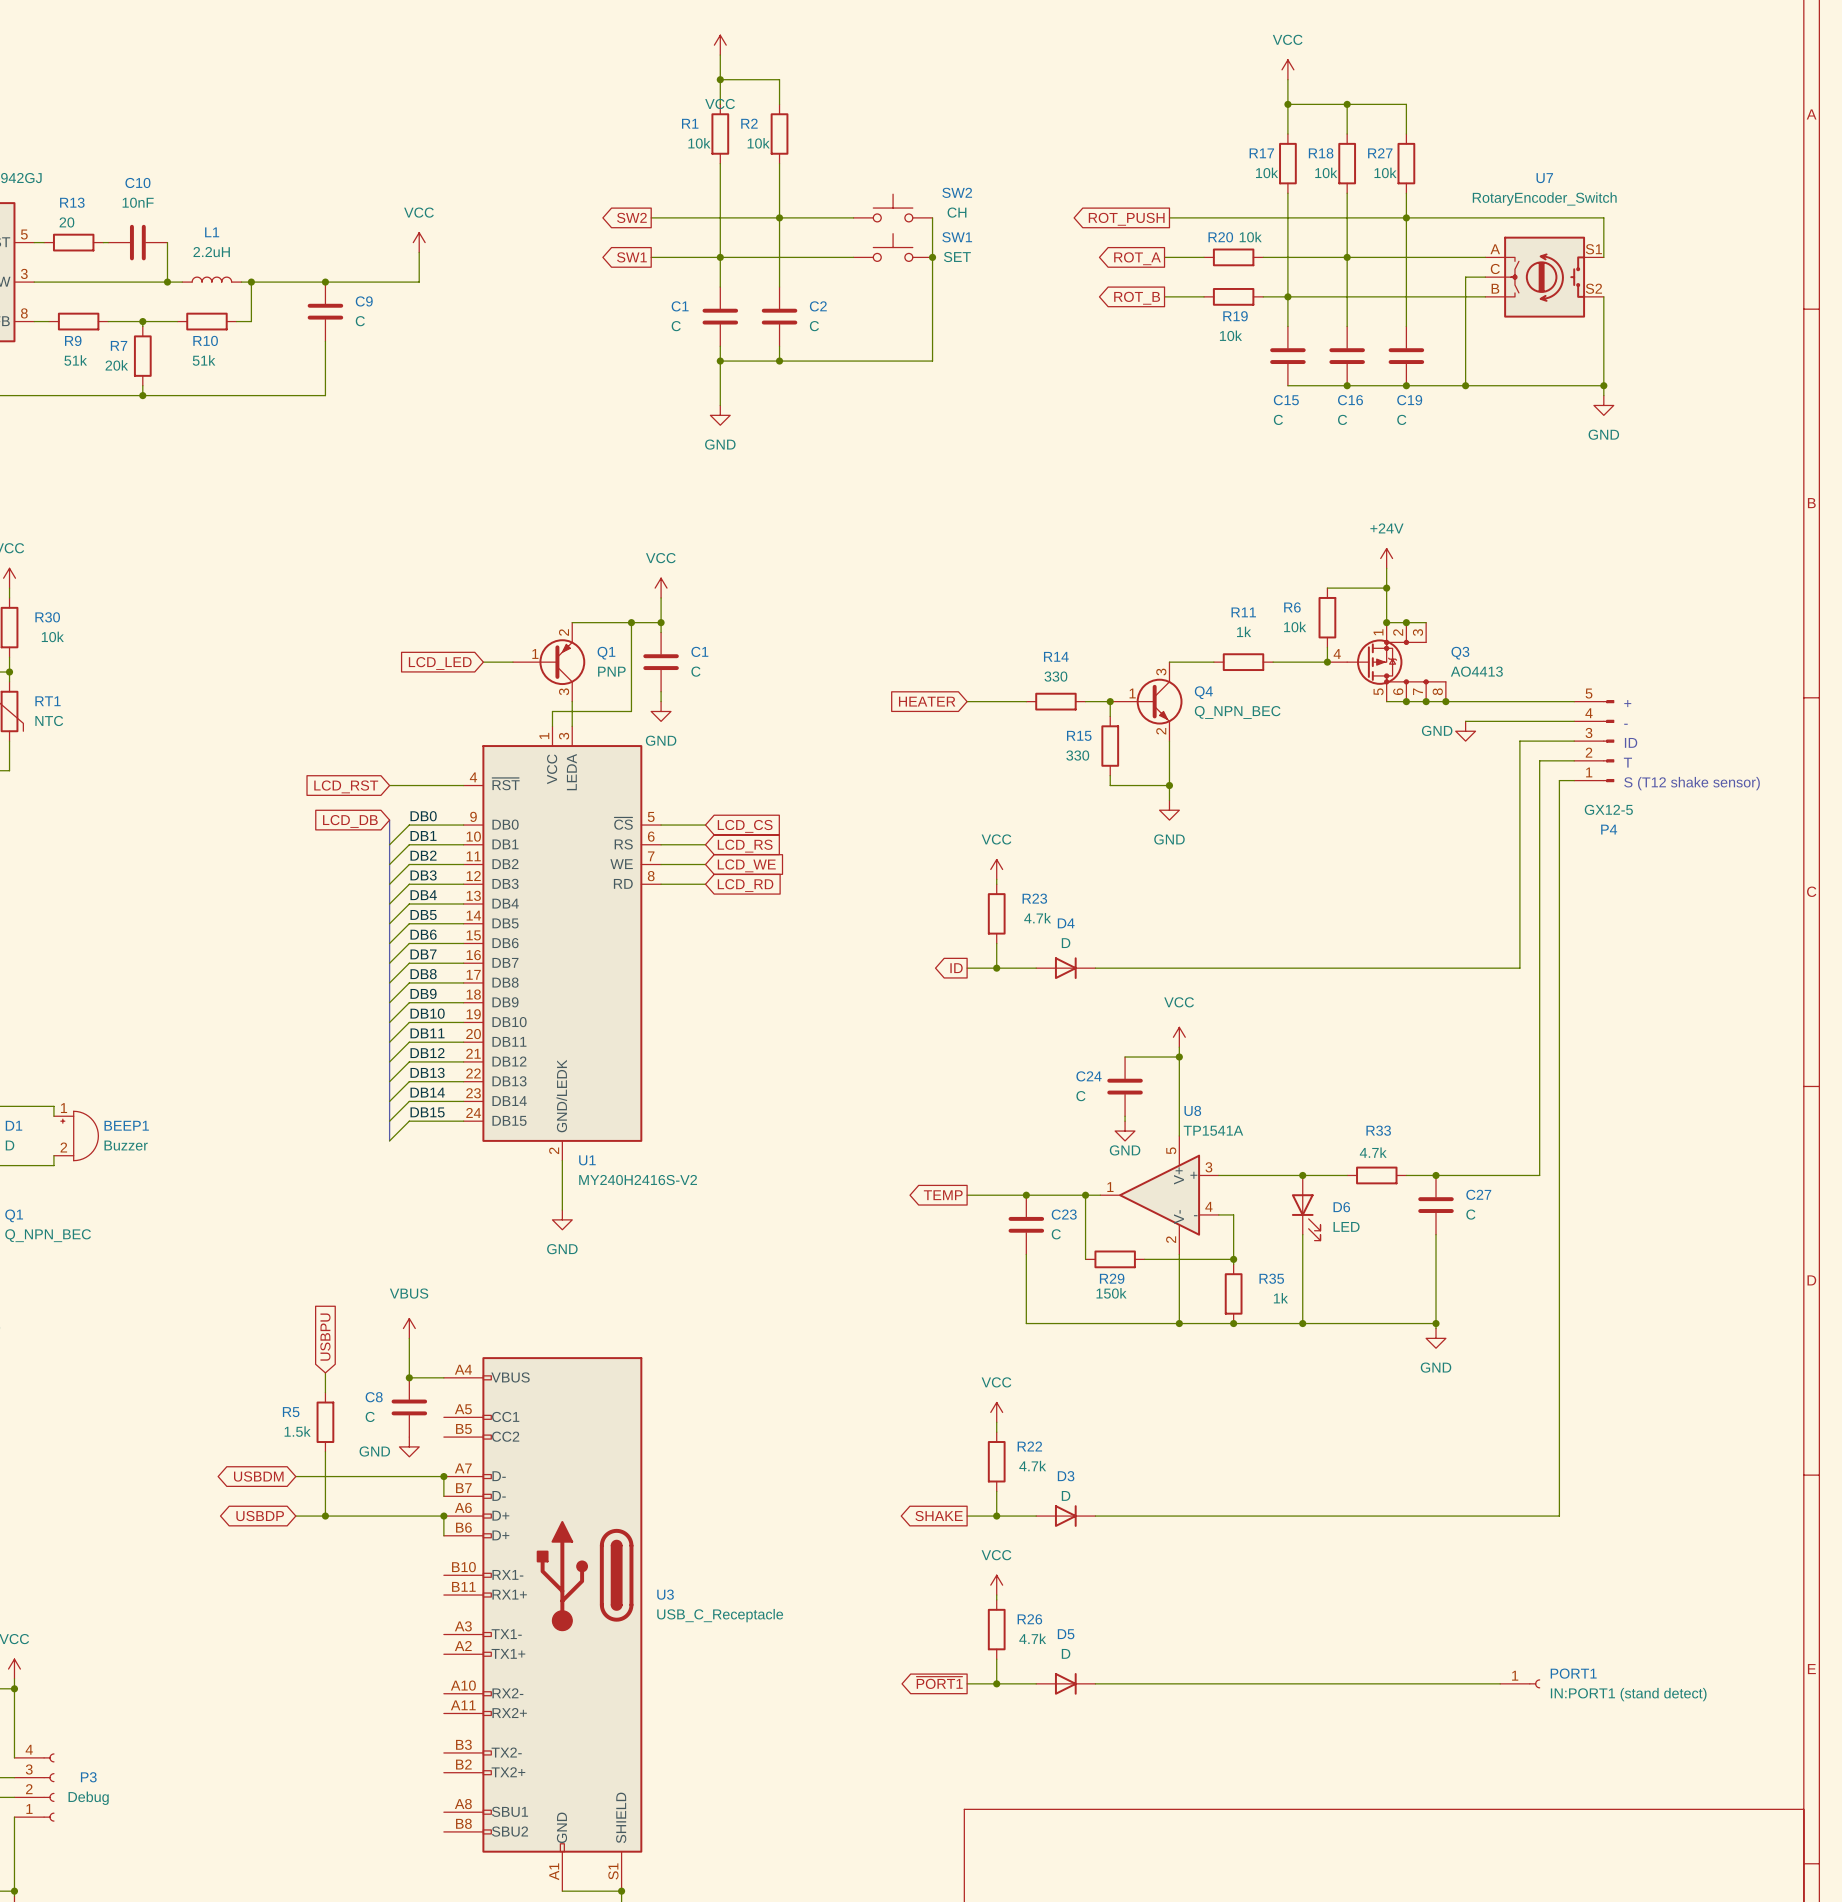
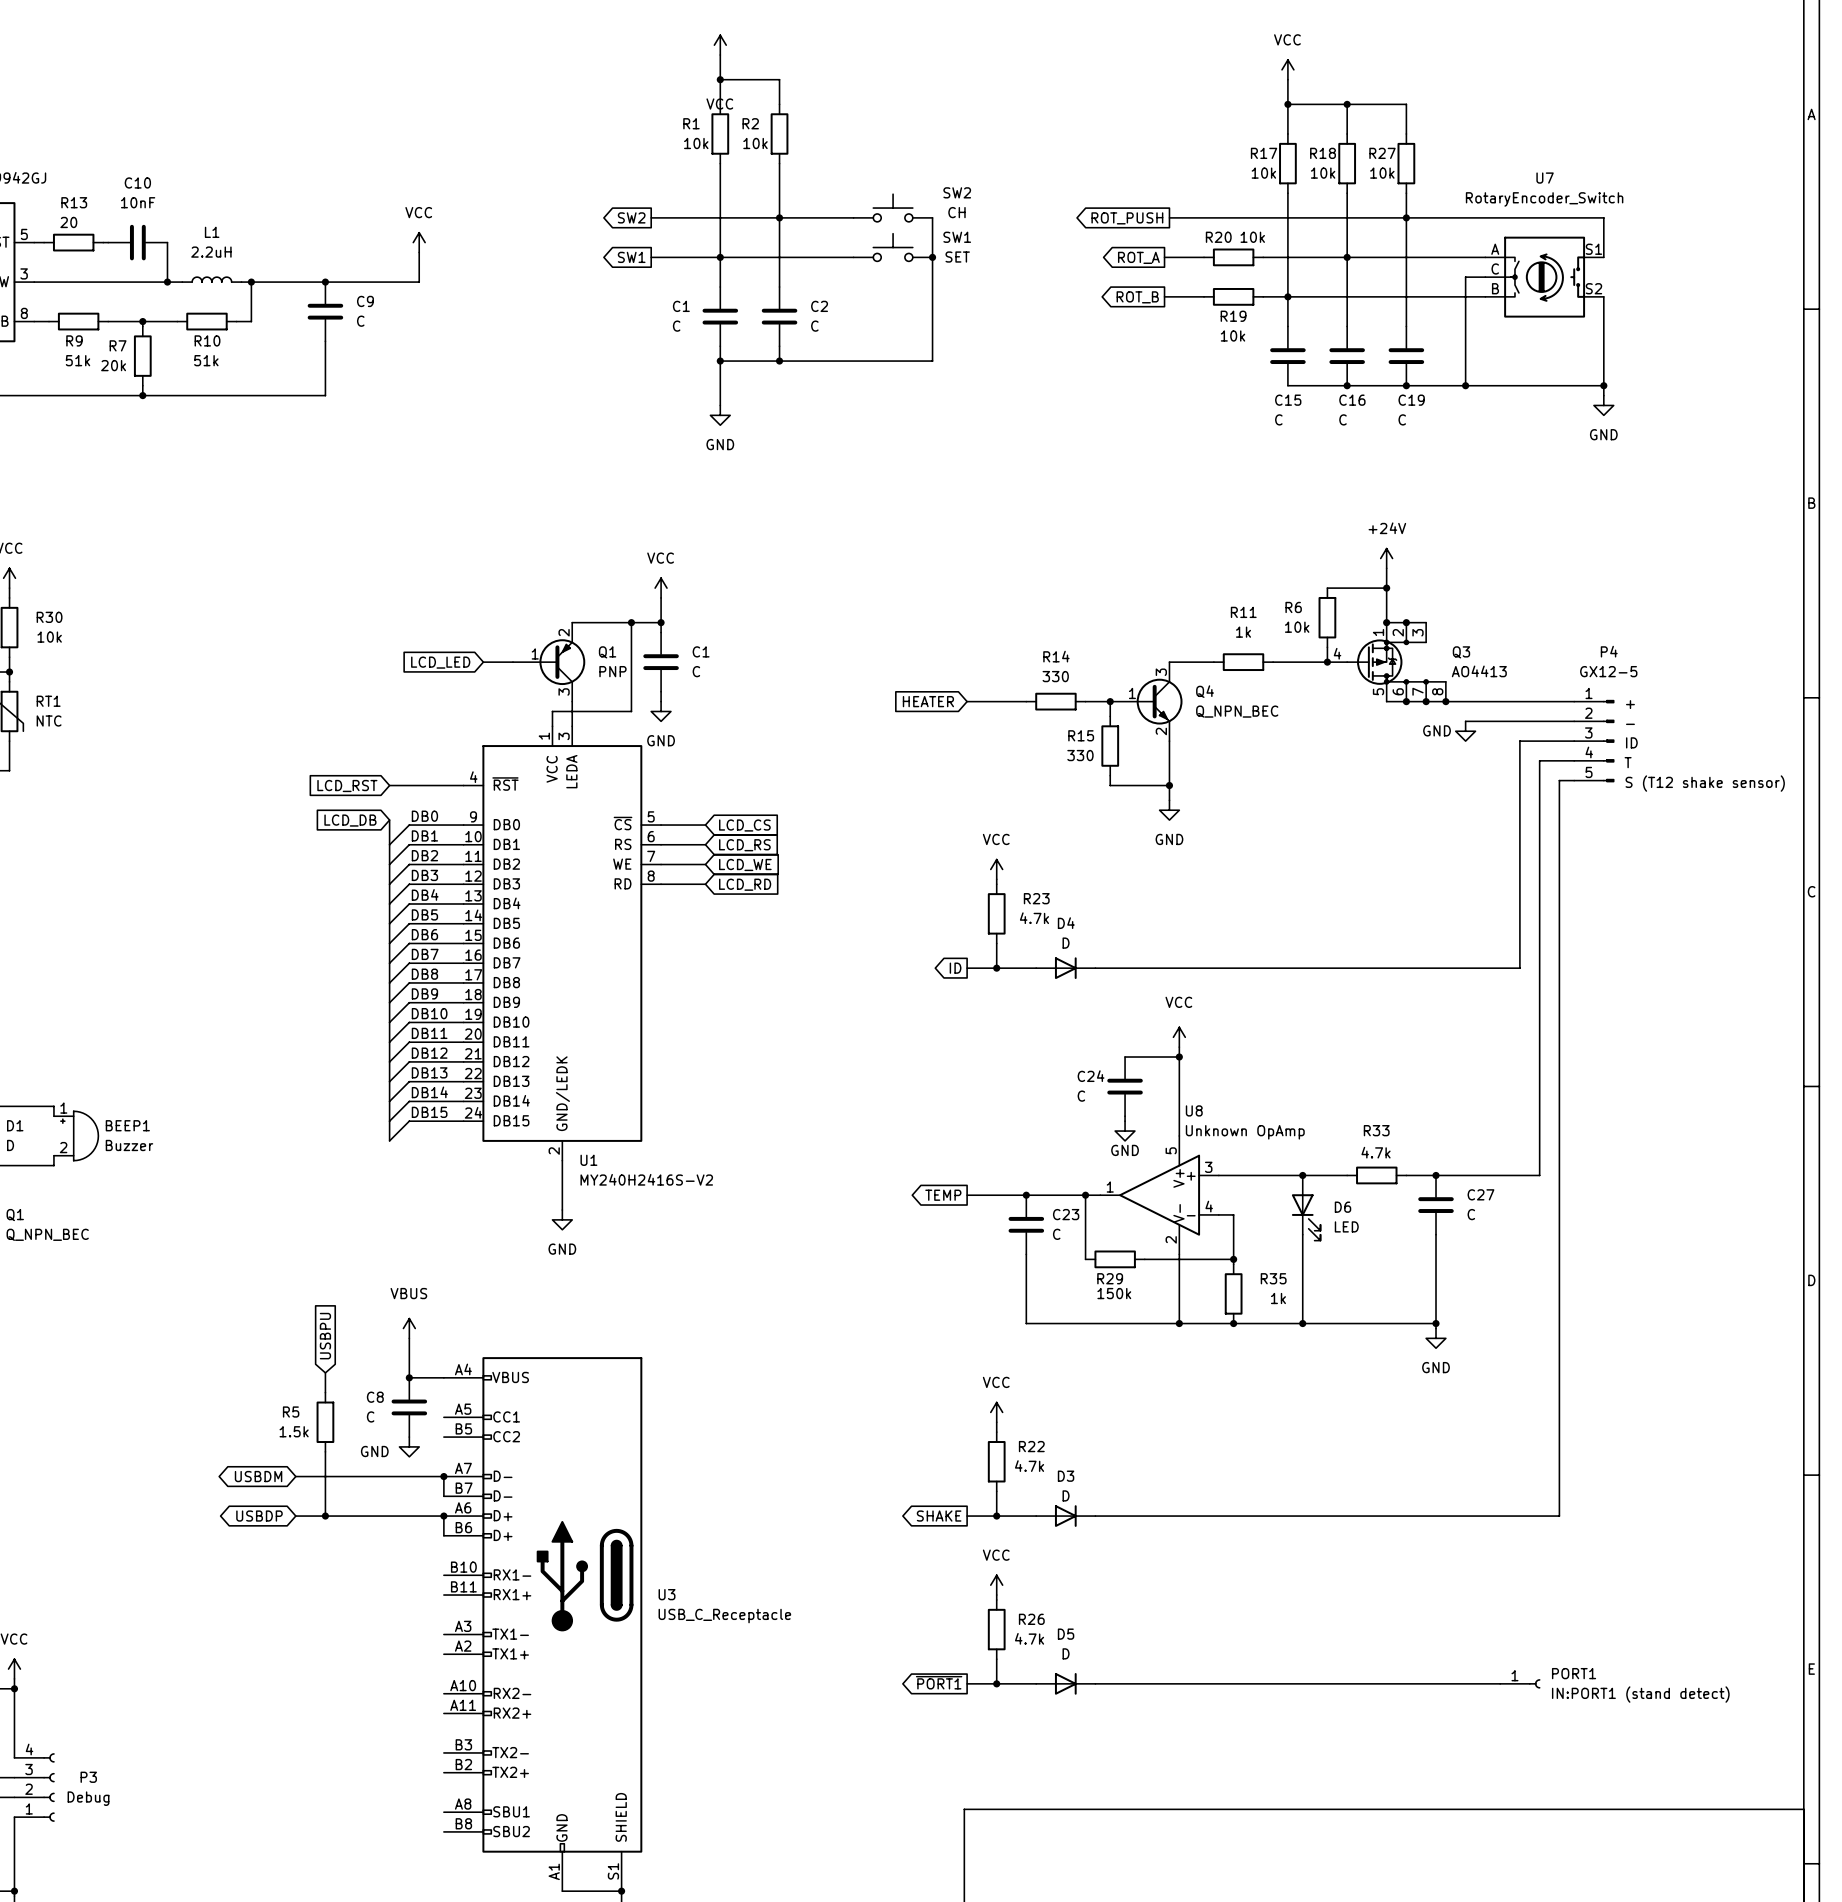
P4 flip: as is (1608, 741) -> up-down (1608, 741)
U8 value: TP1541A (1213, 1130) -> Unknown OpAmp (1245, 1132)

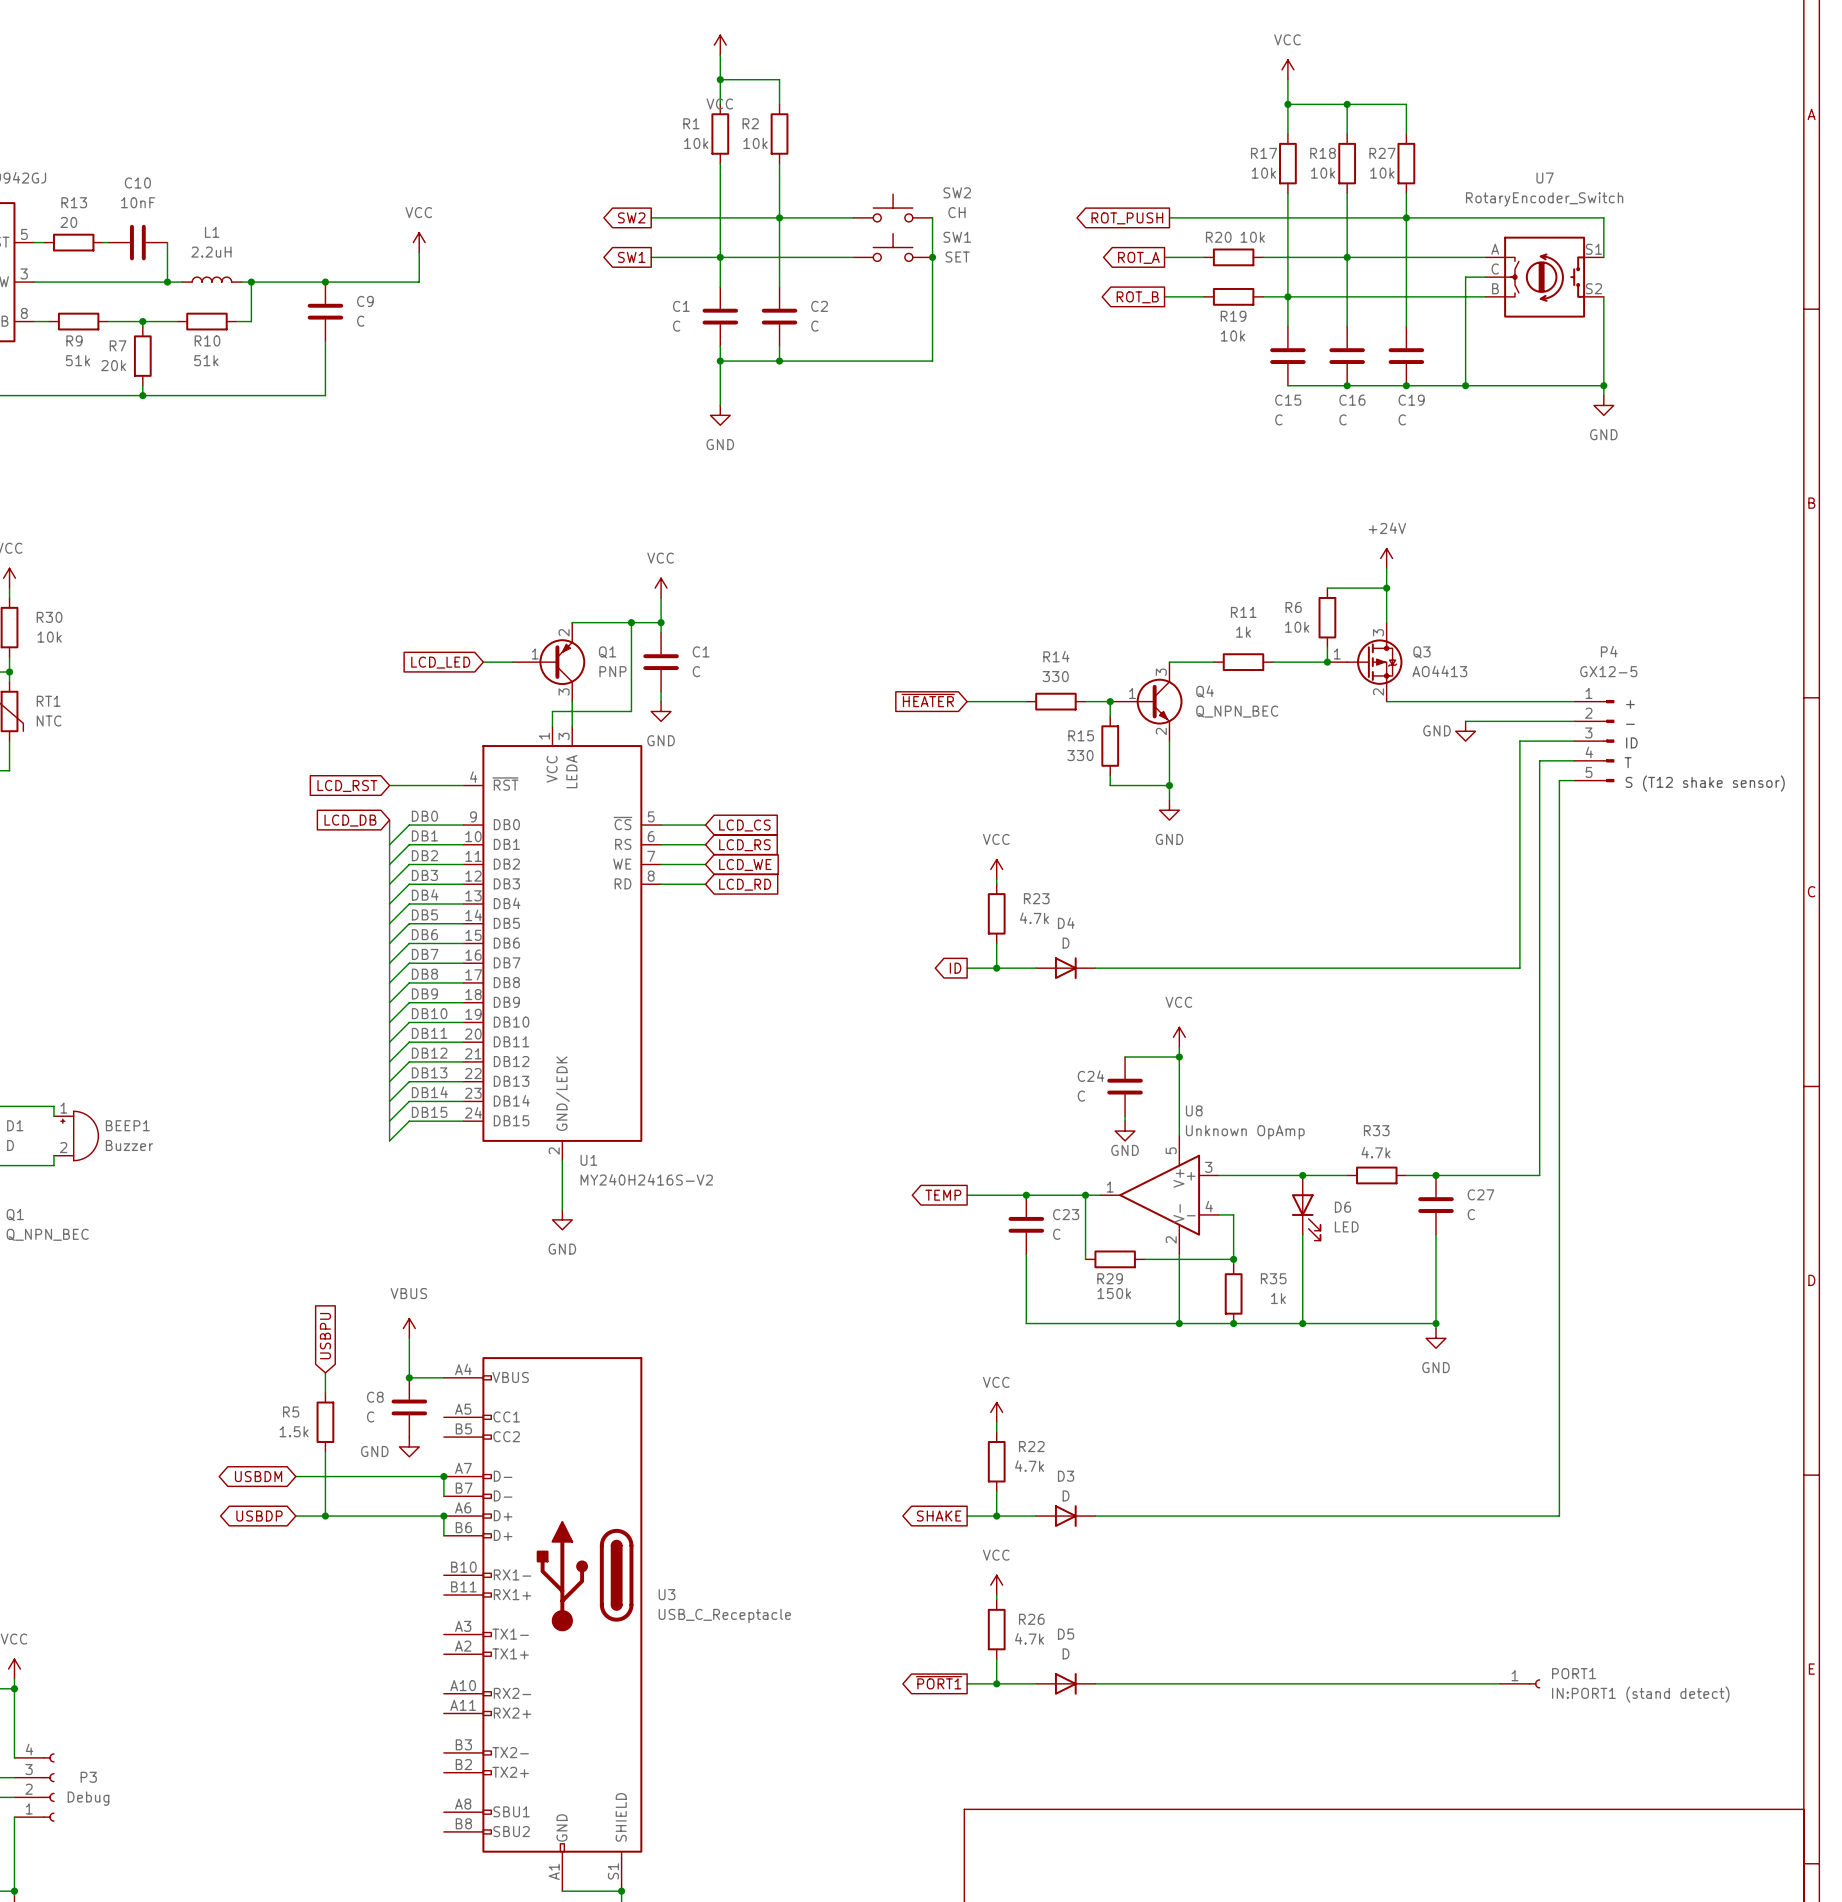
Q3 symbol: [1327, 622, 1446, 702] -> [1327, 622, 1403, 702]
wire: (1386, 622) (1426, 622) -> none
junction: (1386, 622) -> none
junction: (1406, 622) -> none
Q3 name position: Q3 (1461, 652) -> Q3 (1421, 652)
Q3 value position: AO4413 (1479, 671) -> AO4413 (1439, 671)
global label: HEATER (928, 701) -> ~{HEATER} (928, 700)
junction: (1406, 701) -> none
junction: (1426, 701) -> none
junction: (1445, 701) -> none

